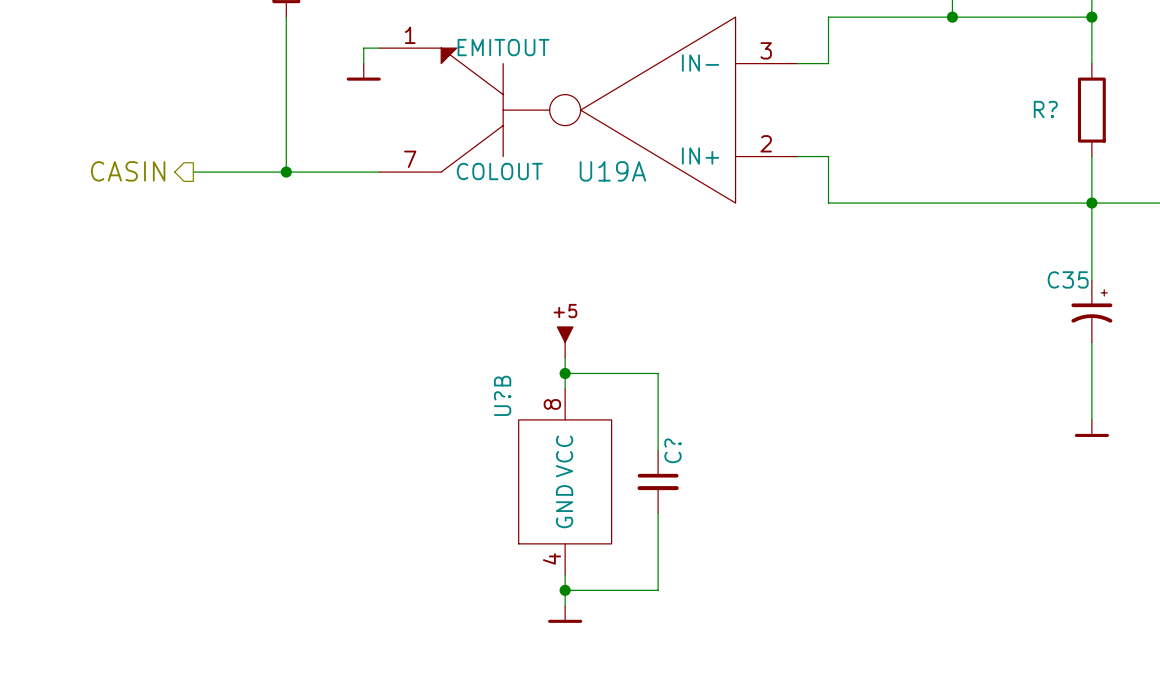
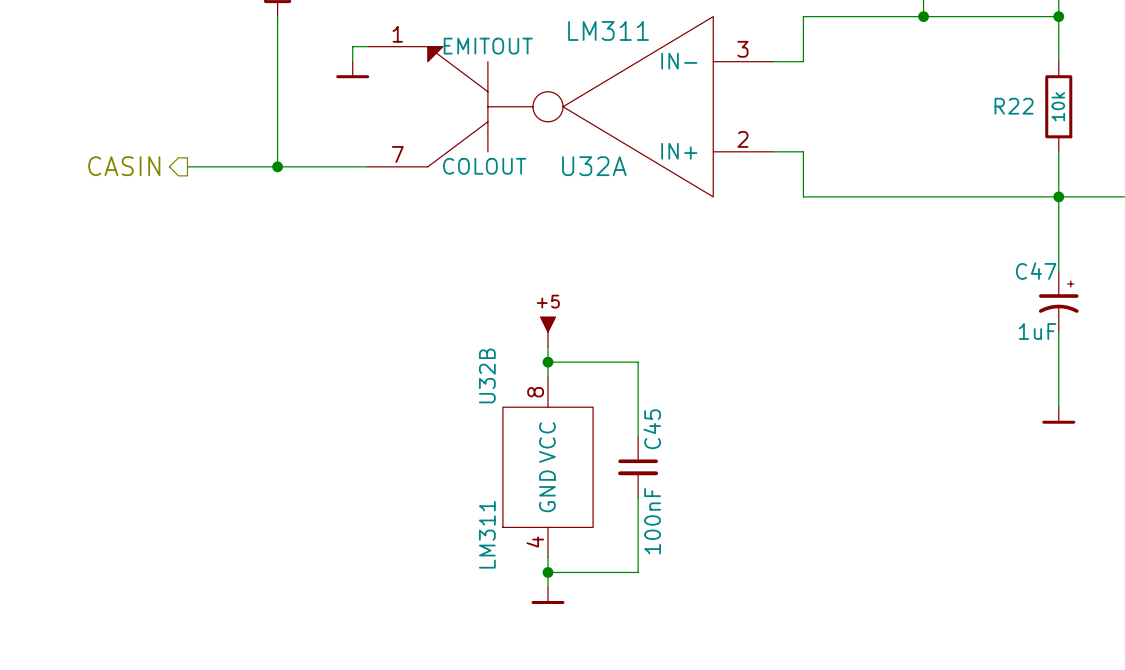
U19A value: none -> LM311 (608, 30)
R? name: R? (1045, 109) -> R22 (1014, 106)
R? value: none -> 10k (1058, 106)
U19A name: U19A (612, 171) -> U32A (594, 166)
C35 name: C35 (1068, 279) -> C47 (1036, 271)
C35 value: none -> 1uF (1037, 331)
U?B name: U?B (502, 395) -> U32B (487, 375)
C? name: C? (673, 450) -> C45 (652, 429)
C? value: none -> 100nF (652, 521)
U?B value: none -> LM311 (487, 534)

